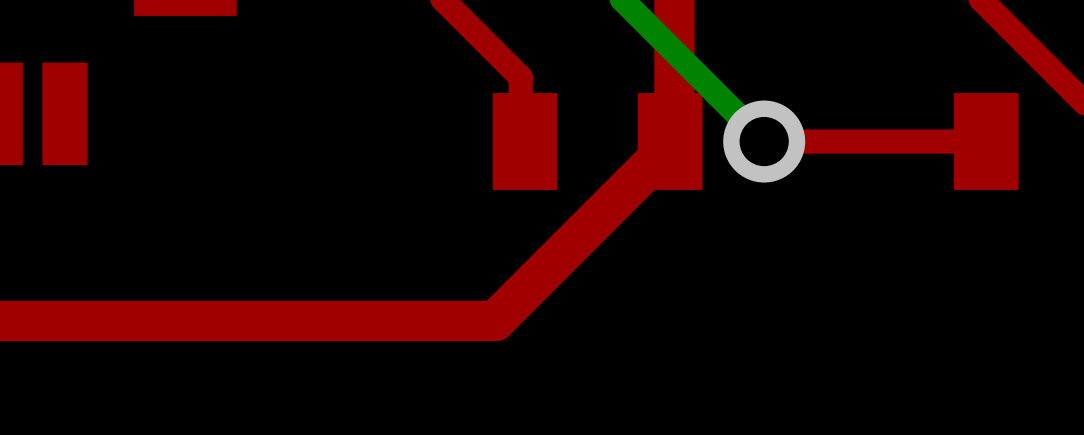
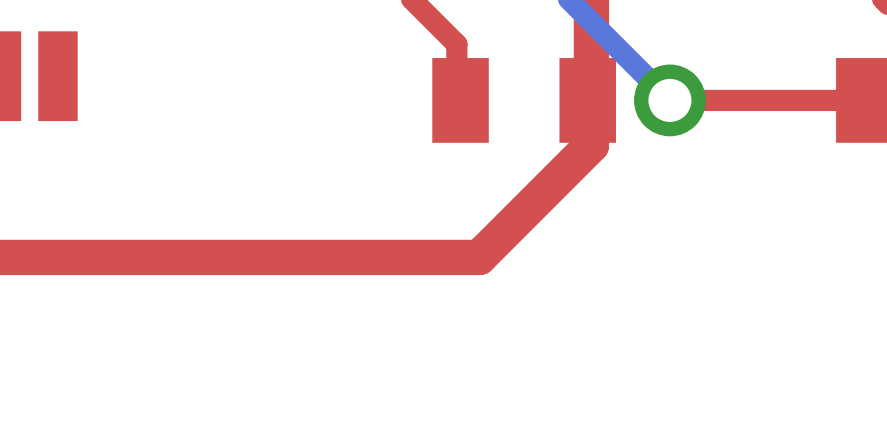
top track: (670, 141) (661, 154) (495, 320) -> (587, 100) (591, 111) (591, 145) (479, 257) (434, 257)

